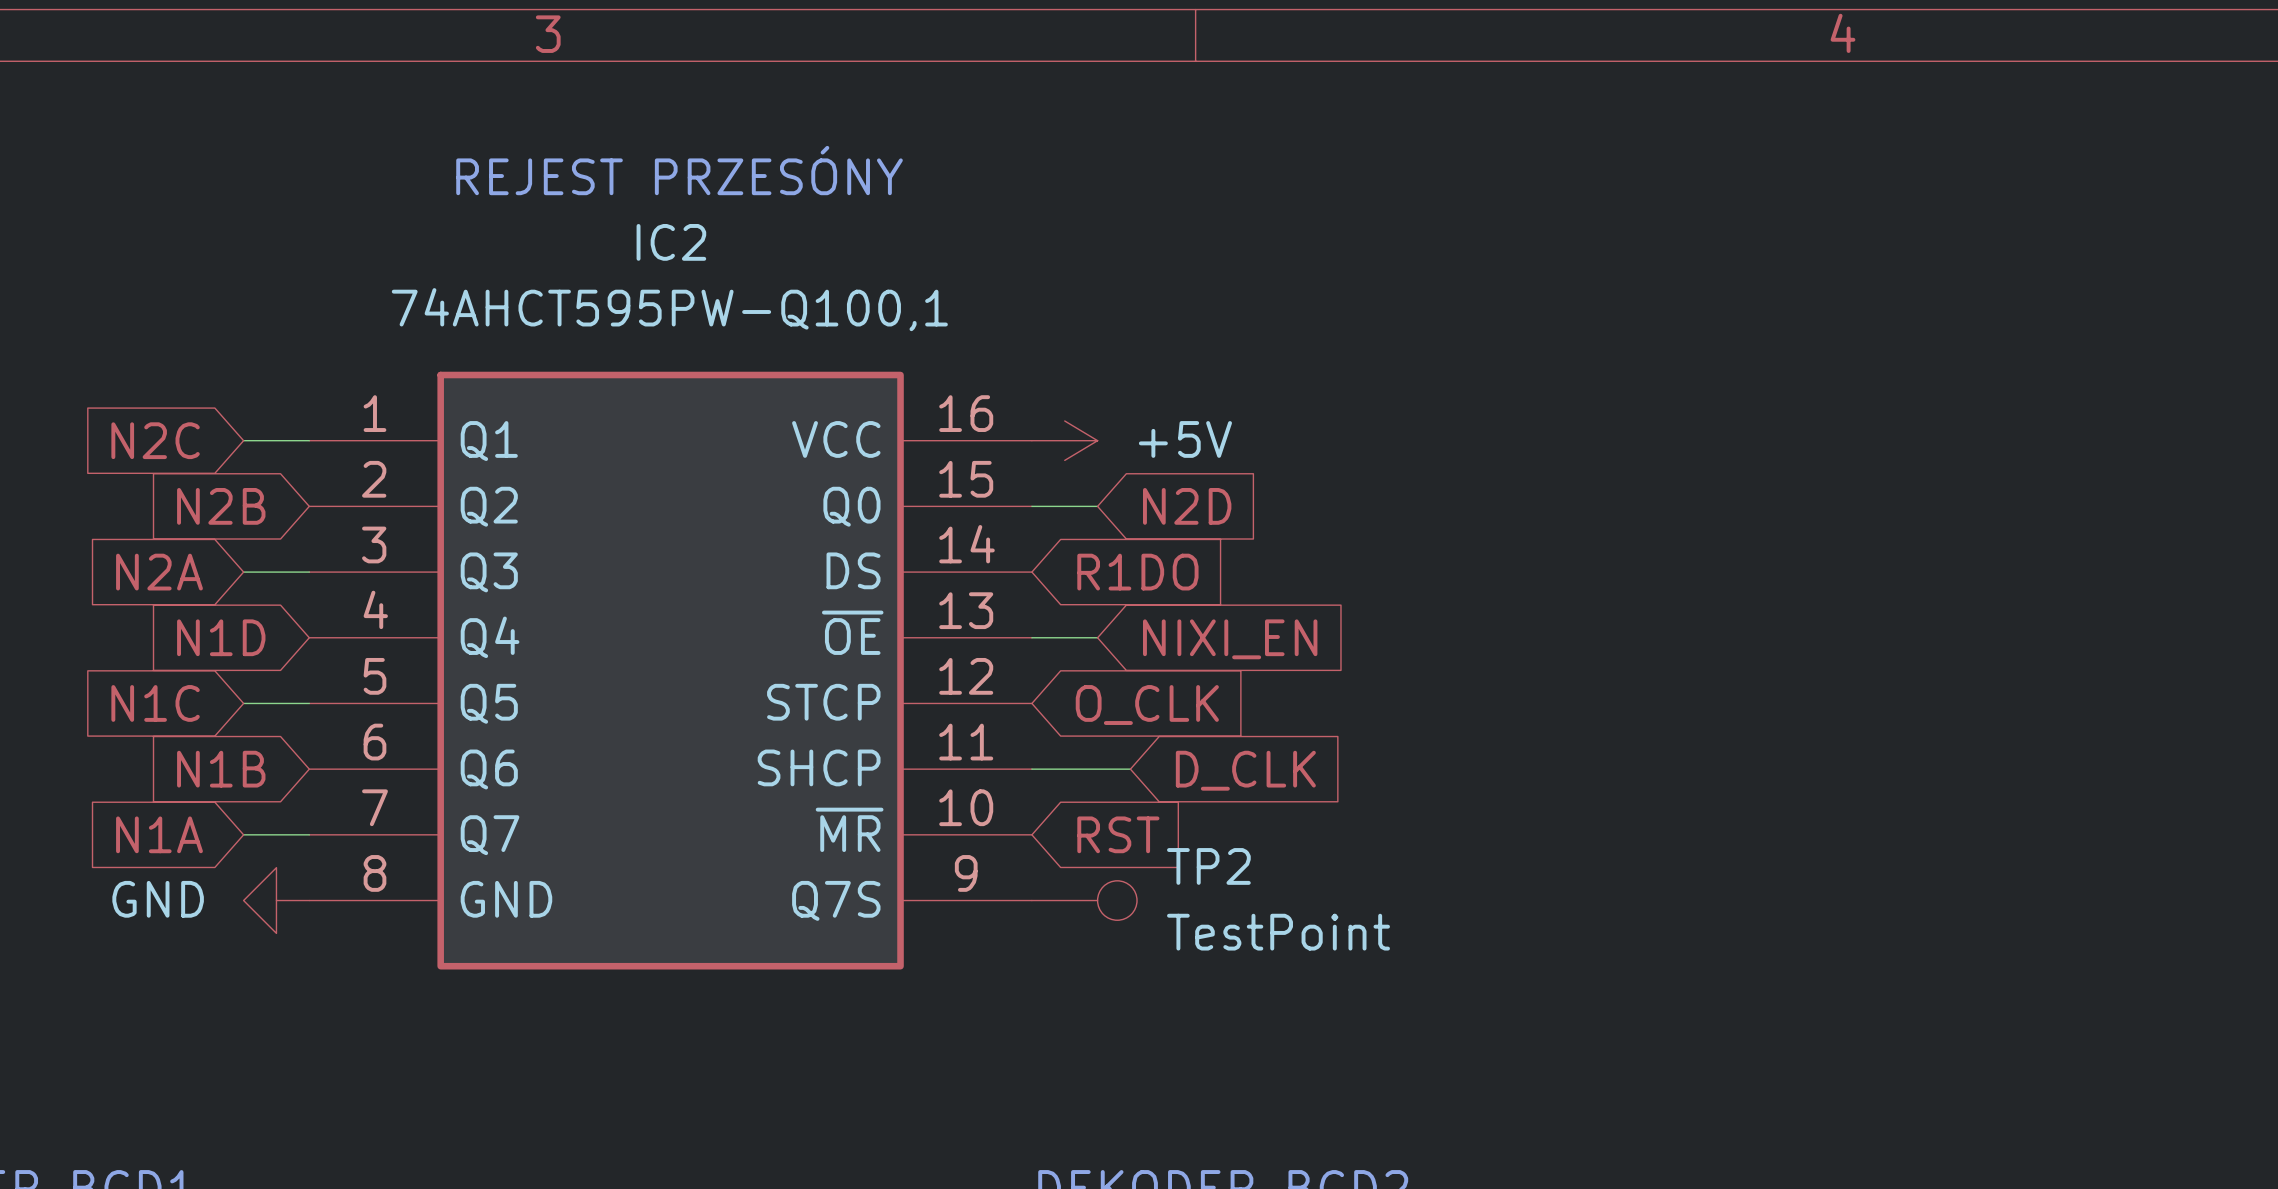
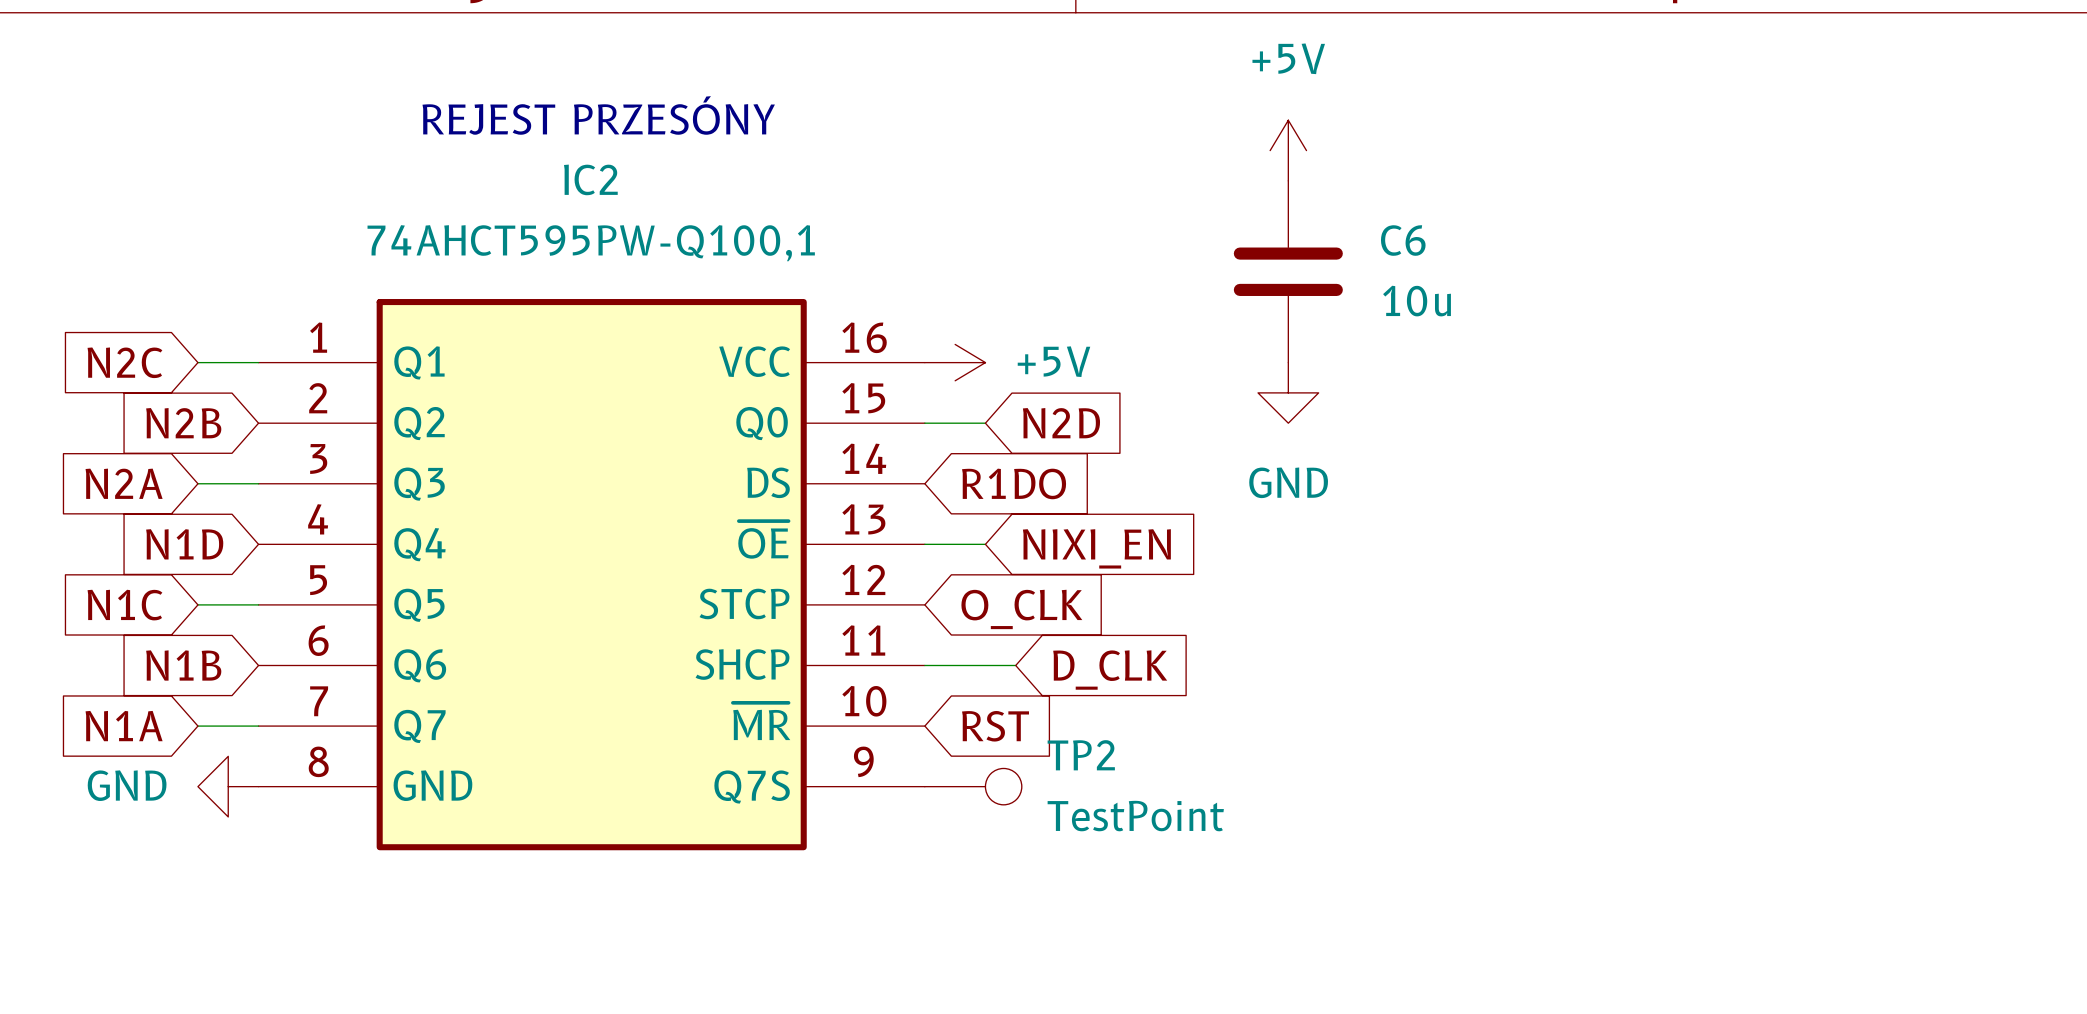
power symbol: none -> +5V (1288, 150)
C6: none -> 10u (1288, 271)
power symbol: none -> GND (1288, 392)

